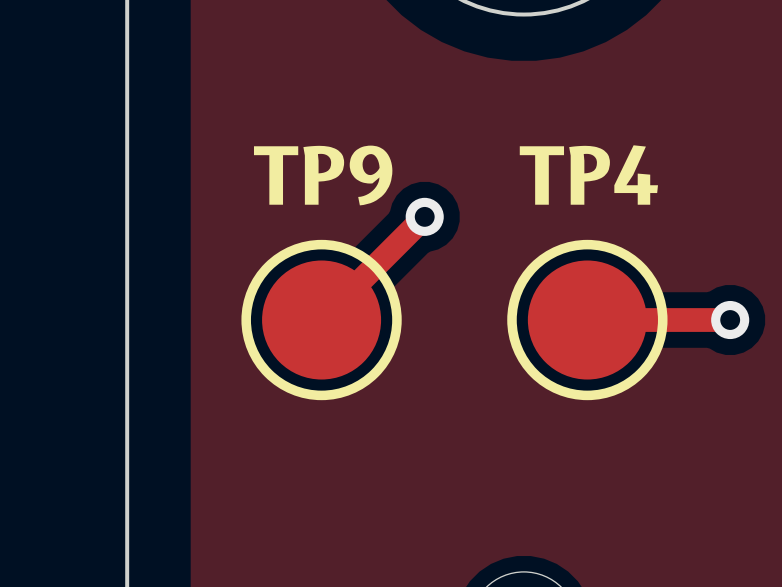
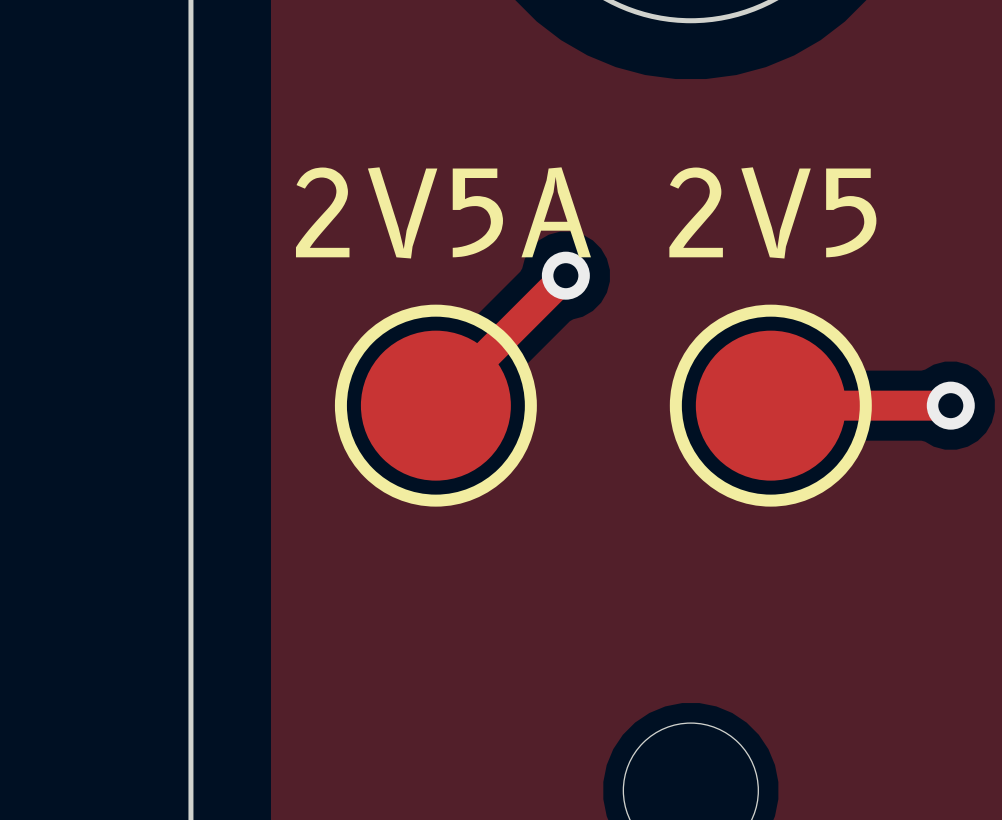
TP9 value: none -> 2V5A (443, 212)
TP4 value: none -> 2V5 (772, 212)
TP9 name: TP9 (323, 175) -> none
TP4 name: TP4 (588, 175) -> none

